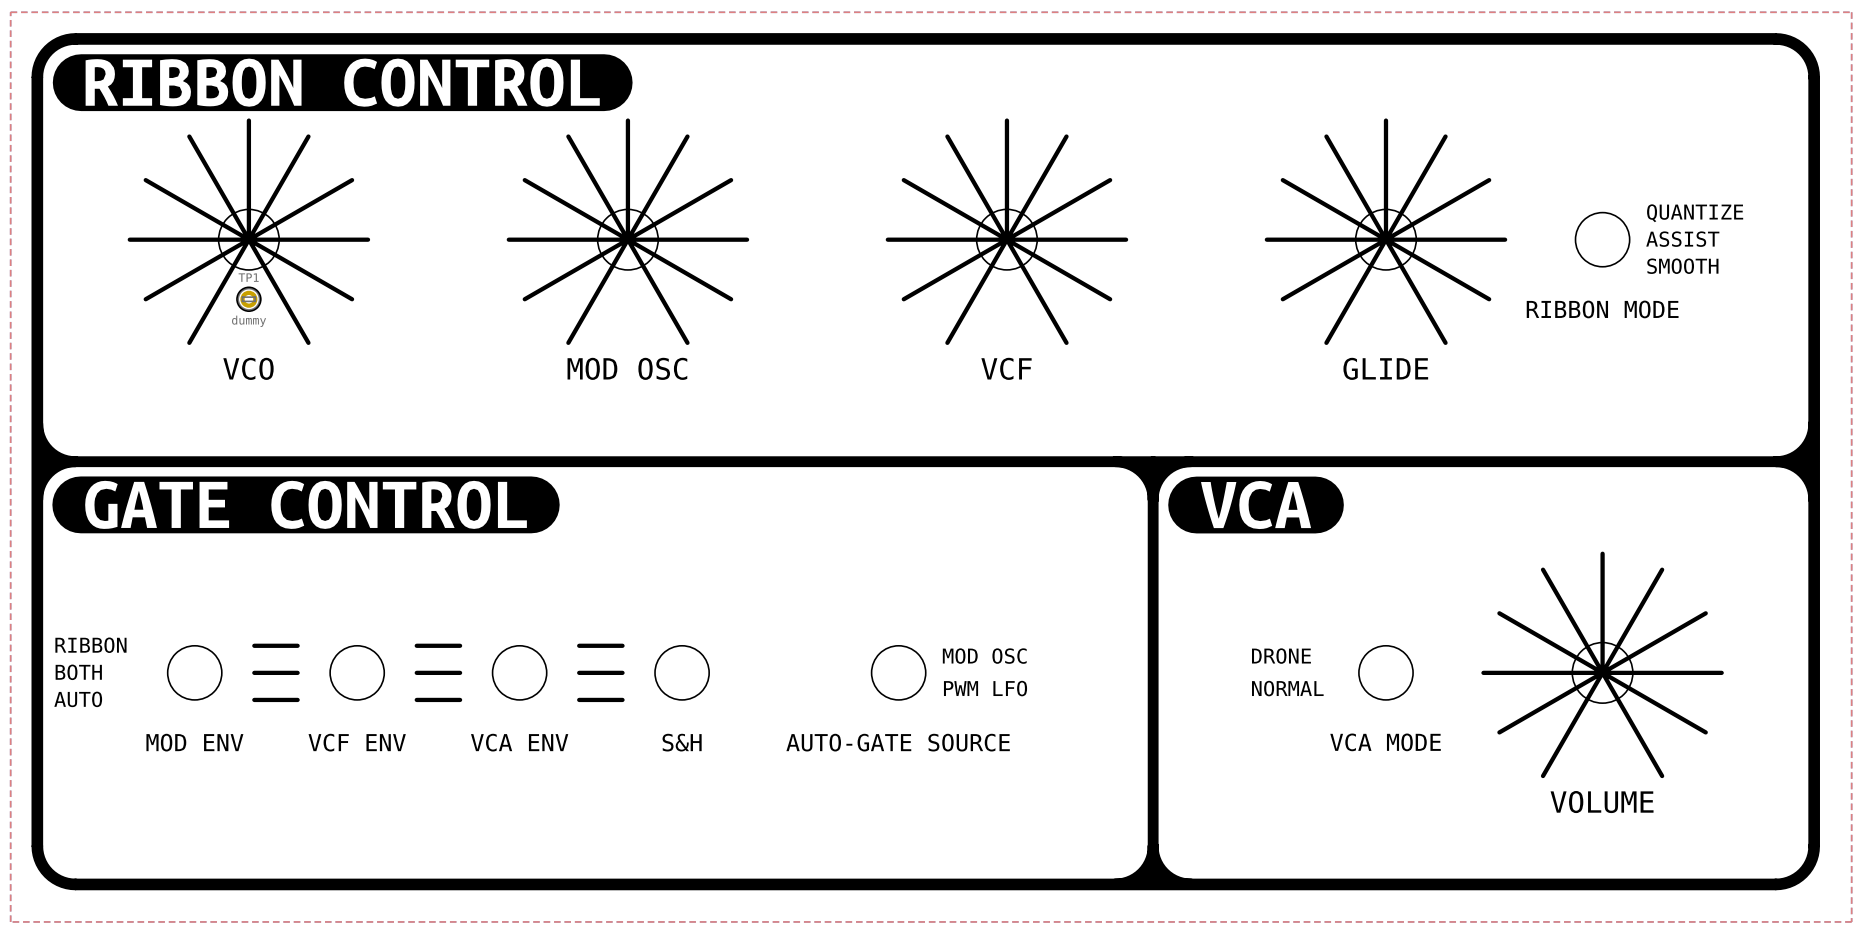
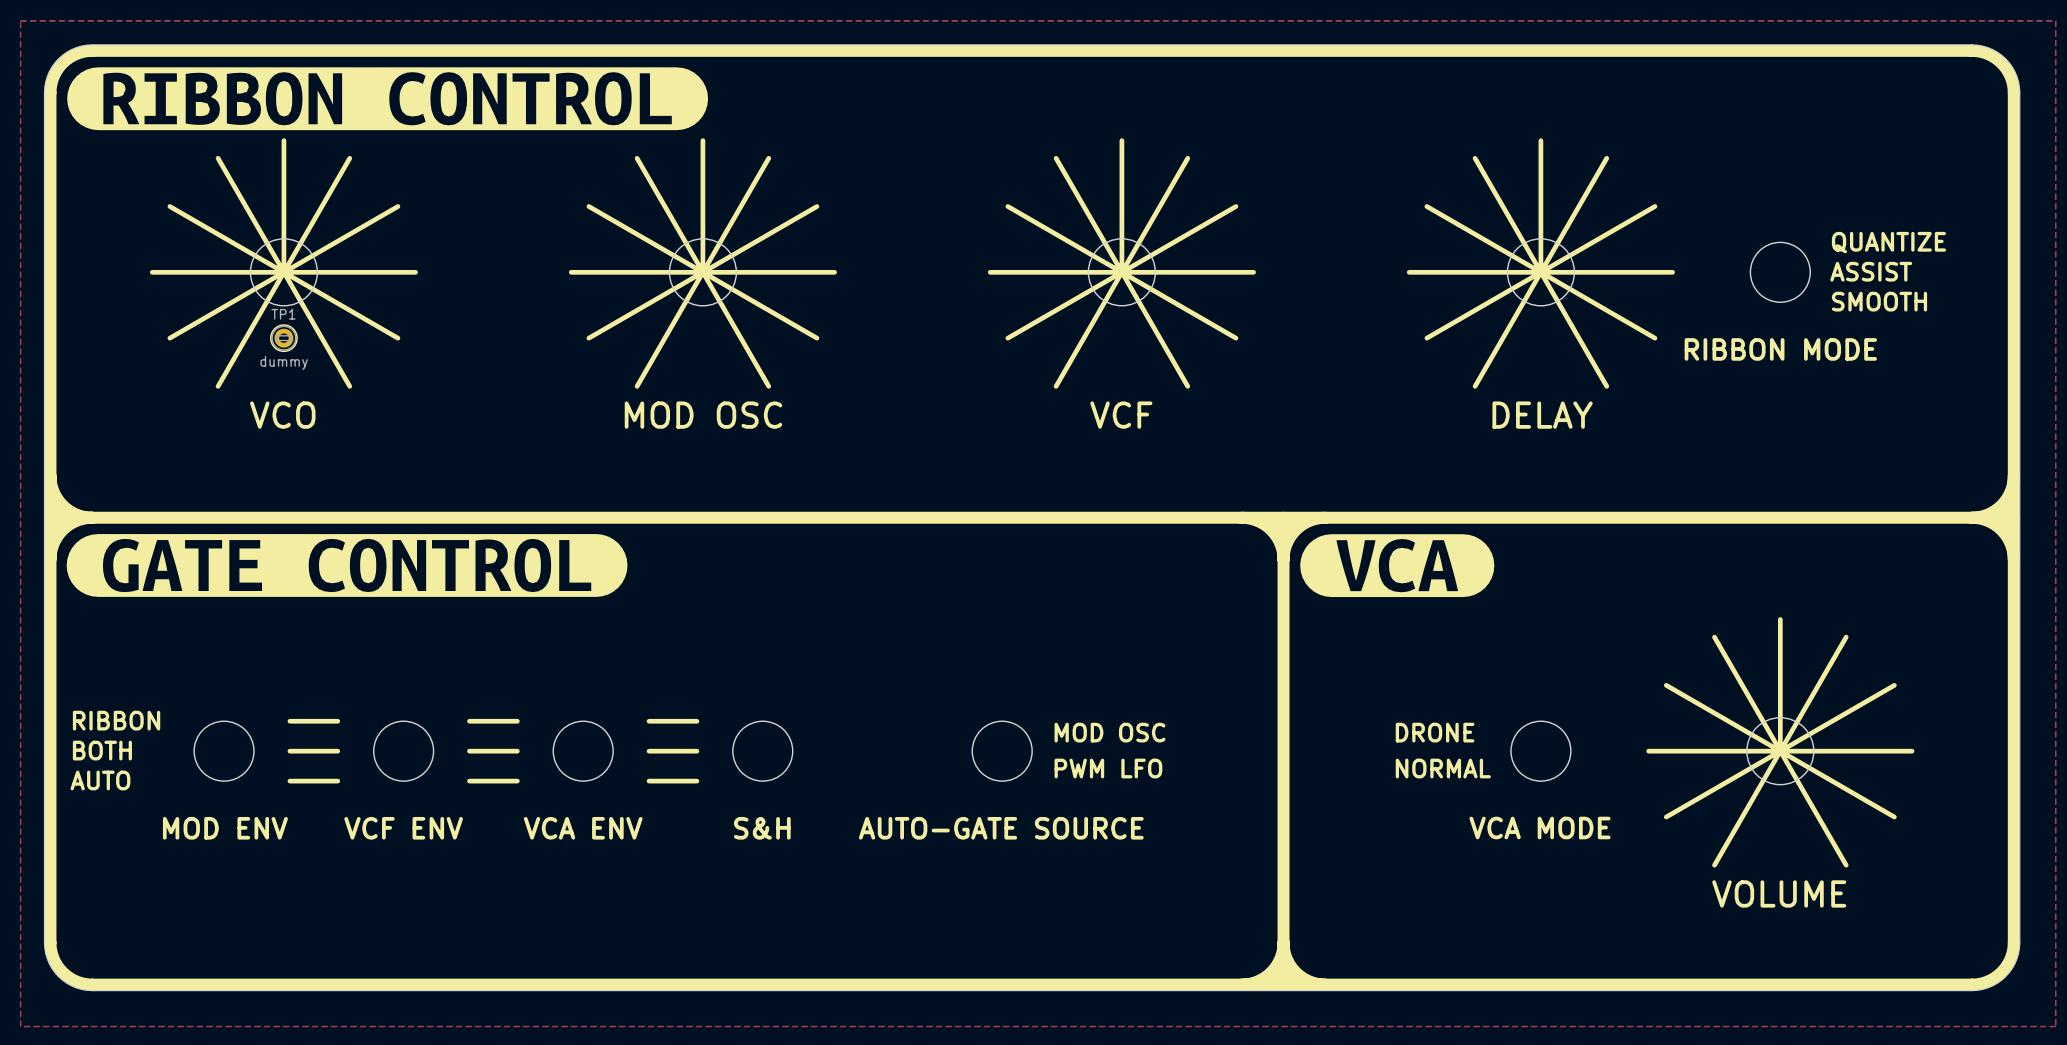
text: GLIDE (1385, 368) -> DELAY (1542, 415)

